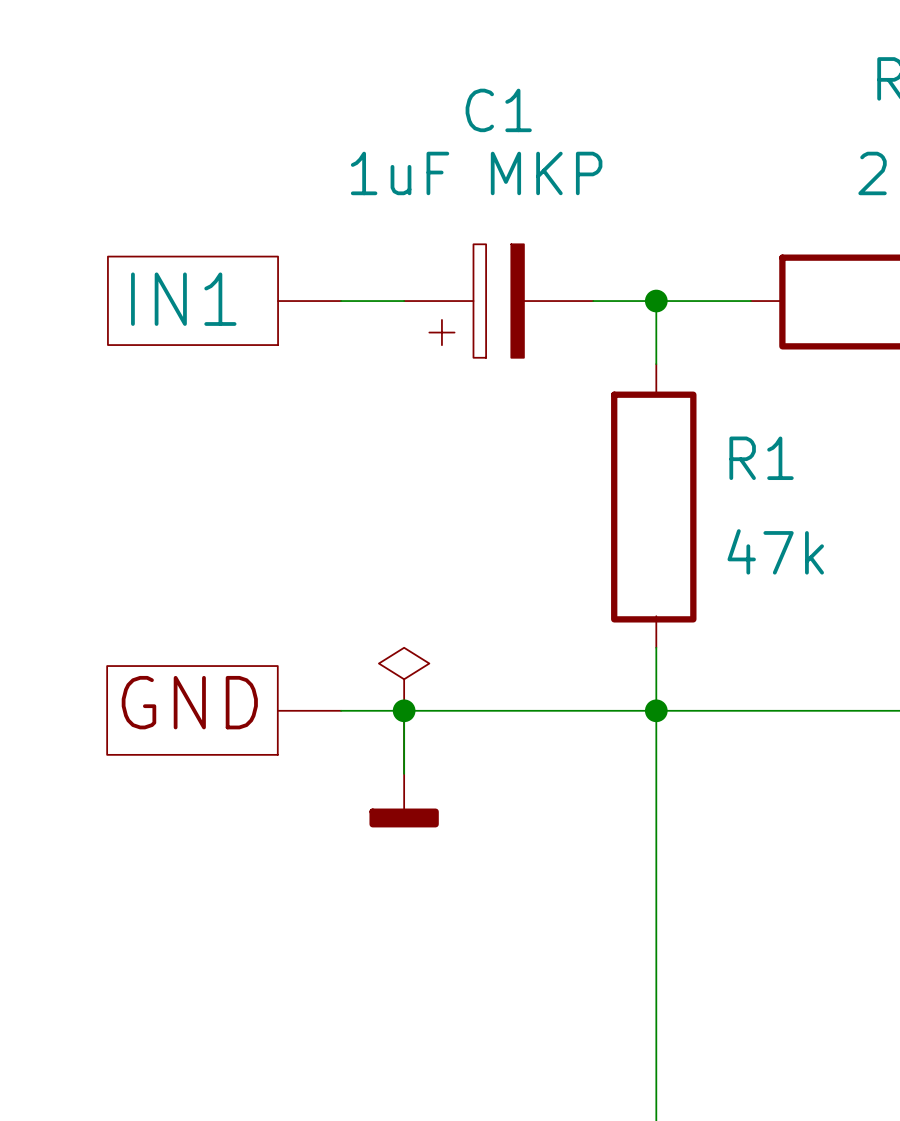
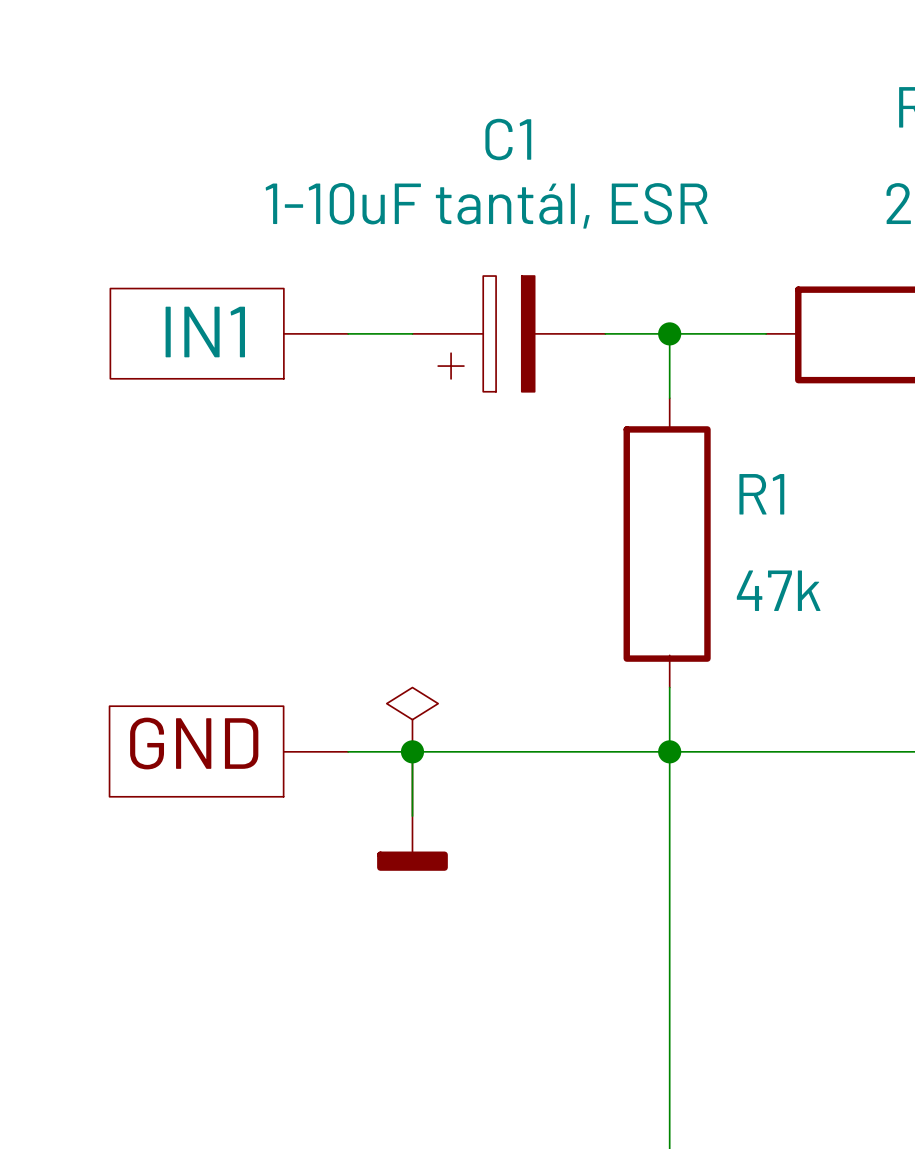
C1 value: 1uF MKP (476, 173) -> 1-10uF tantál, ESR (486, 205)

